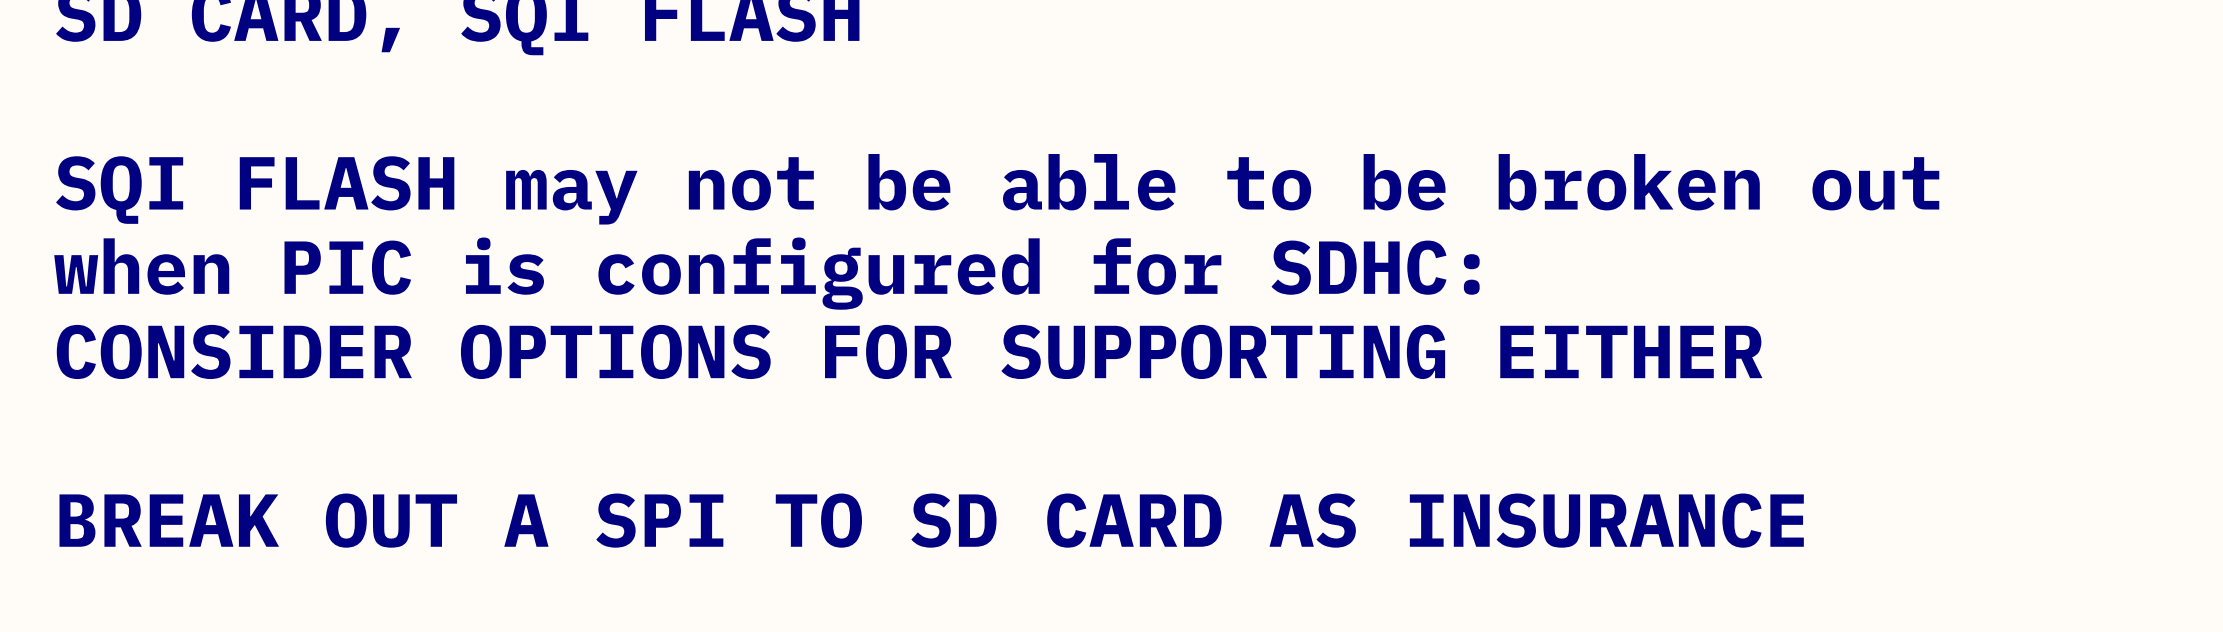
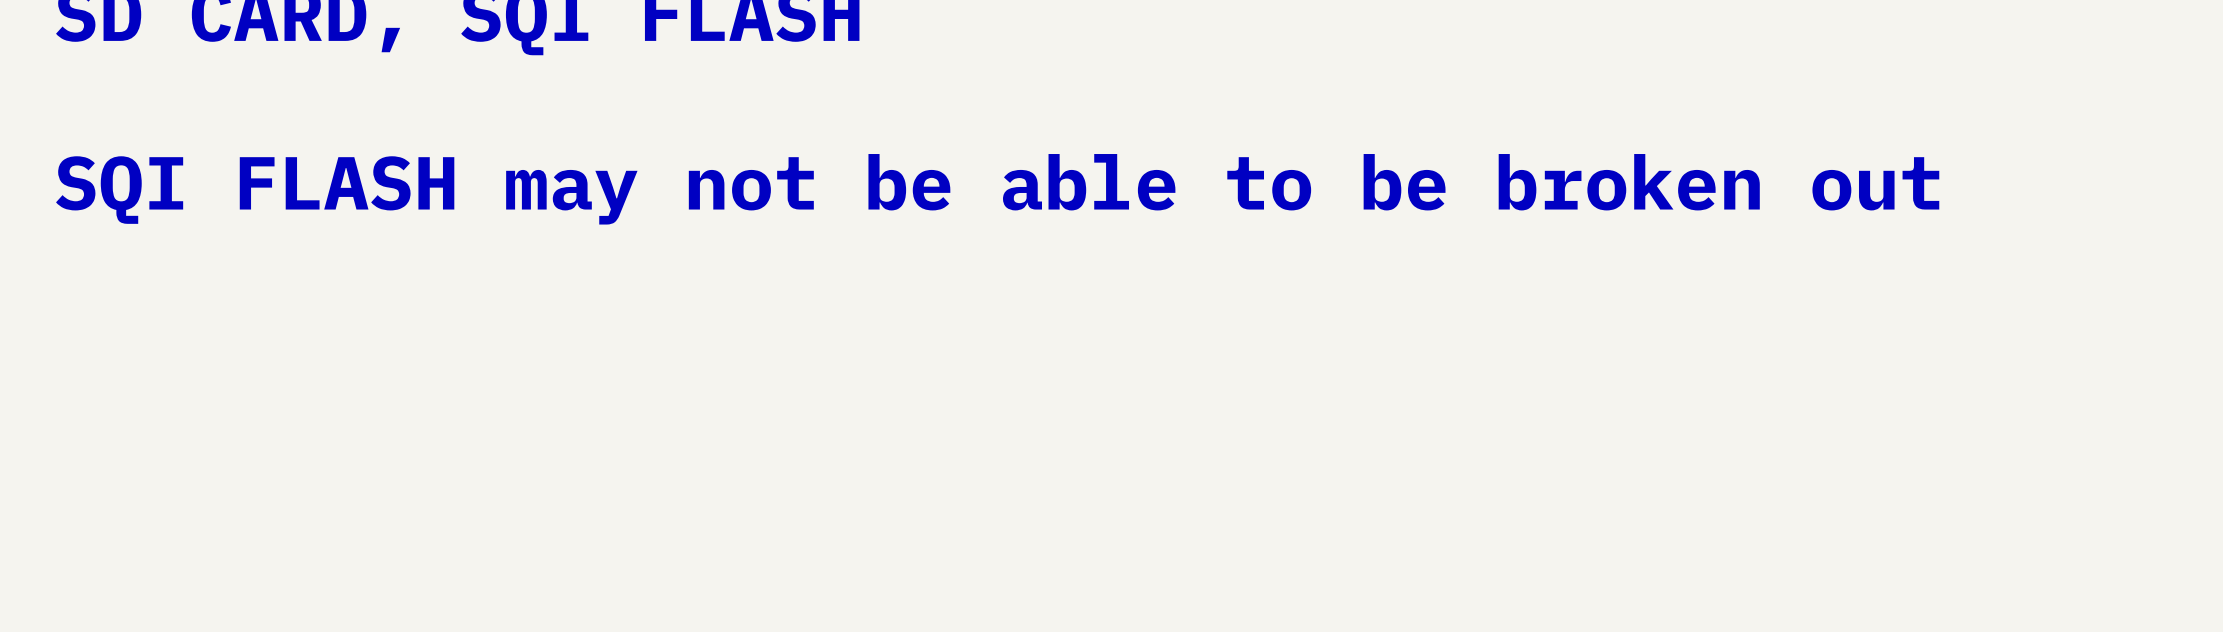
text: when PIC is configured for SDHC: (766, 273) -> none
text: CONSIDER OPTIONS FOR SUPPORTING EITHER (909, 351) -> none
text: BREAK OUT A SPI TO SD CARD AS INSURANCE (931, 520) -> none

